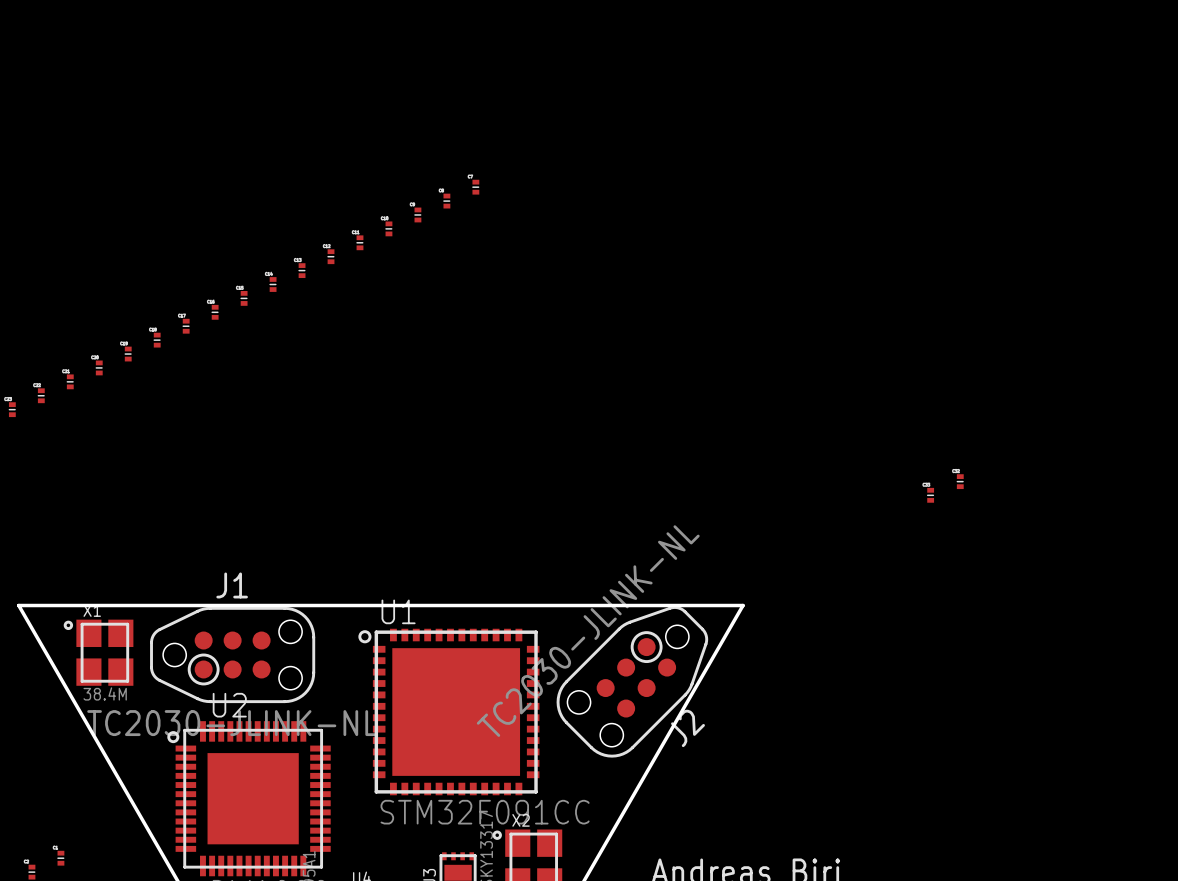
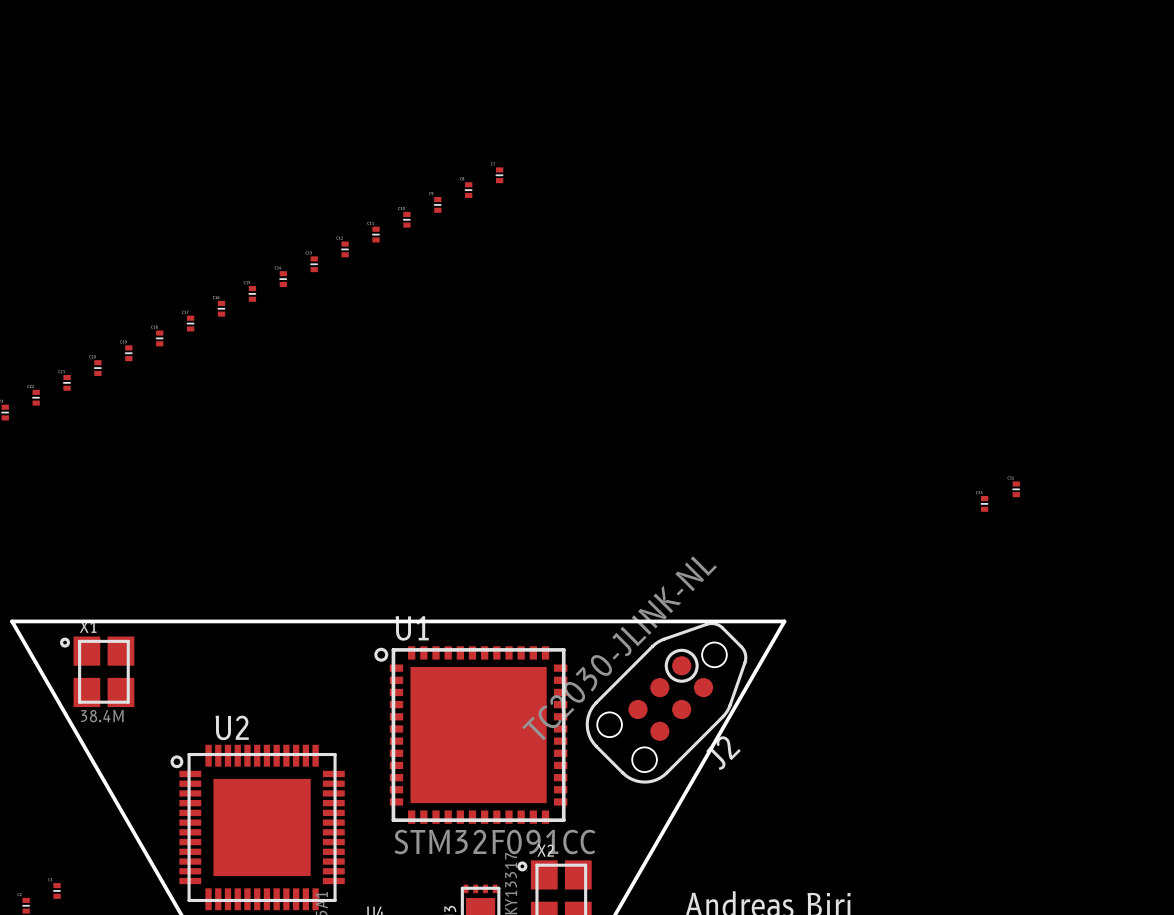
J1: TC2030-JLINK-NL (232, 655) -> none

